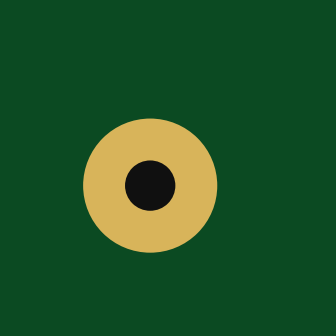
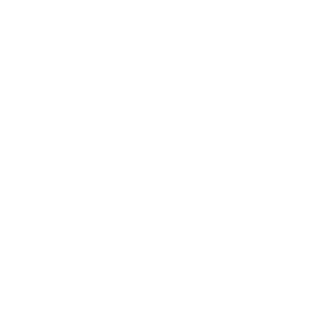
part: (150, 185) -> none

